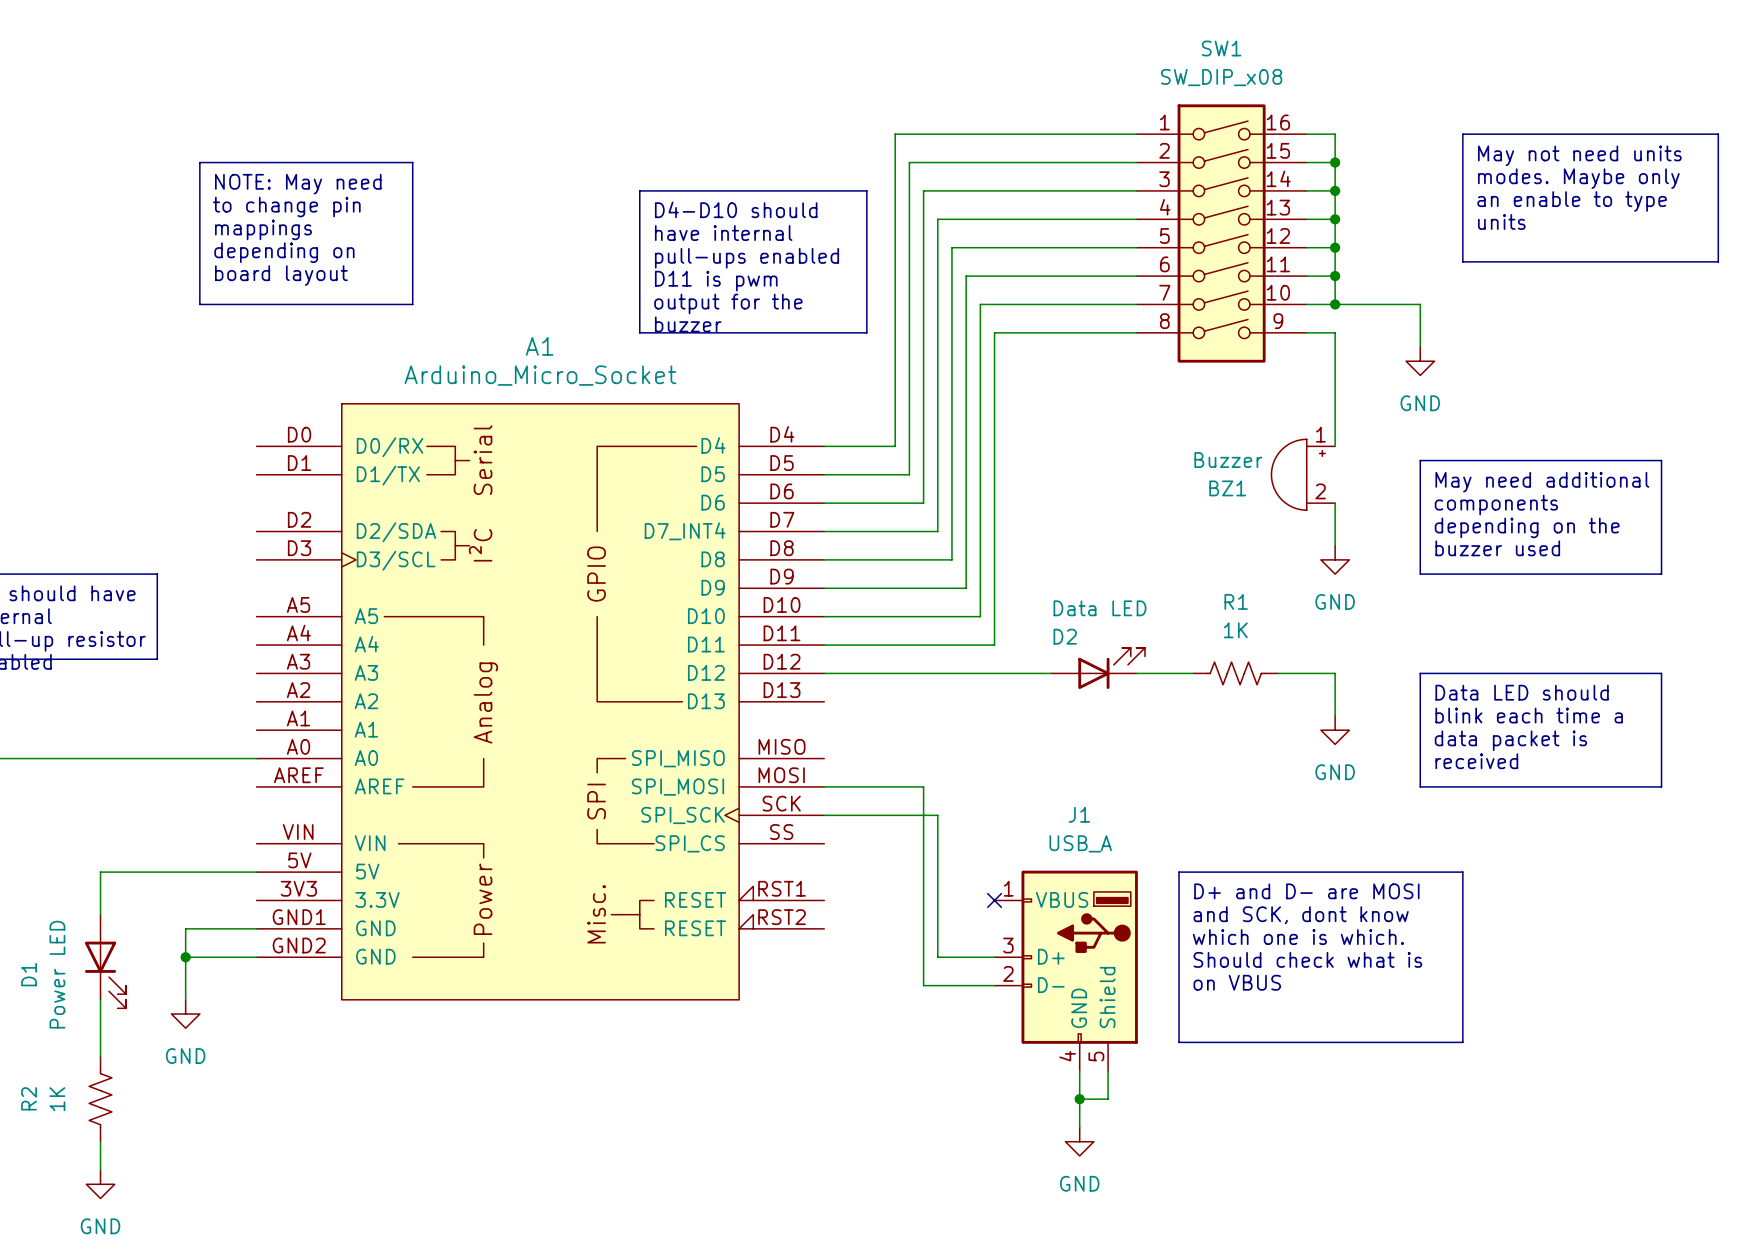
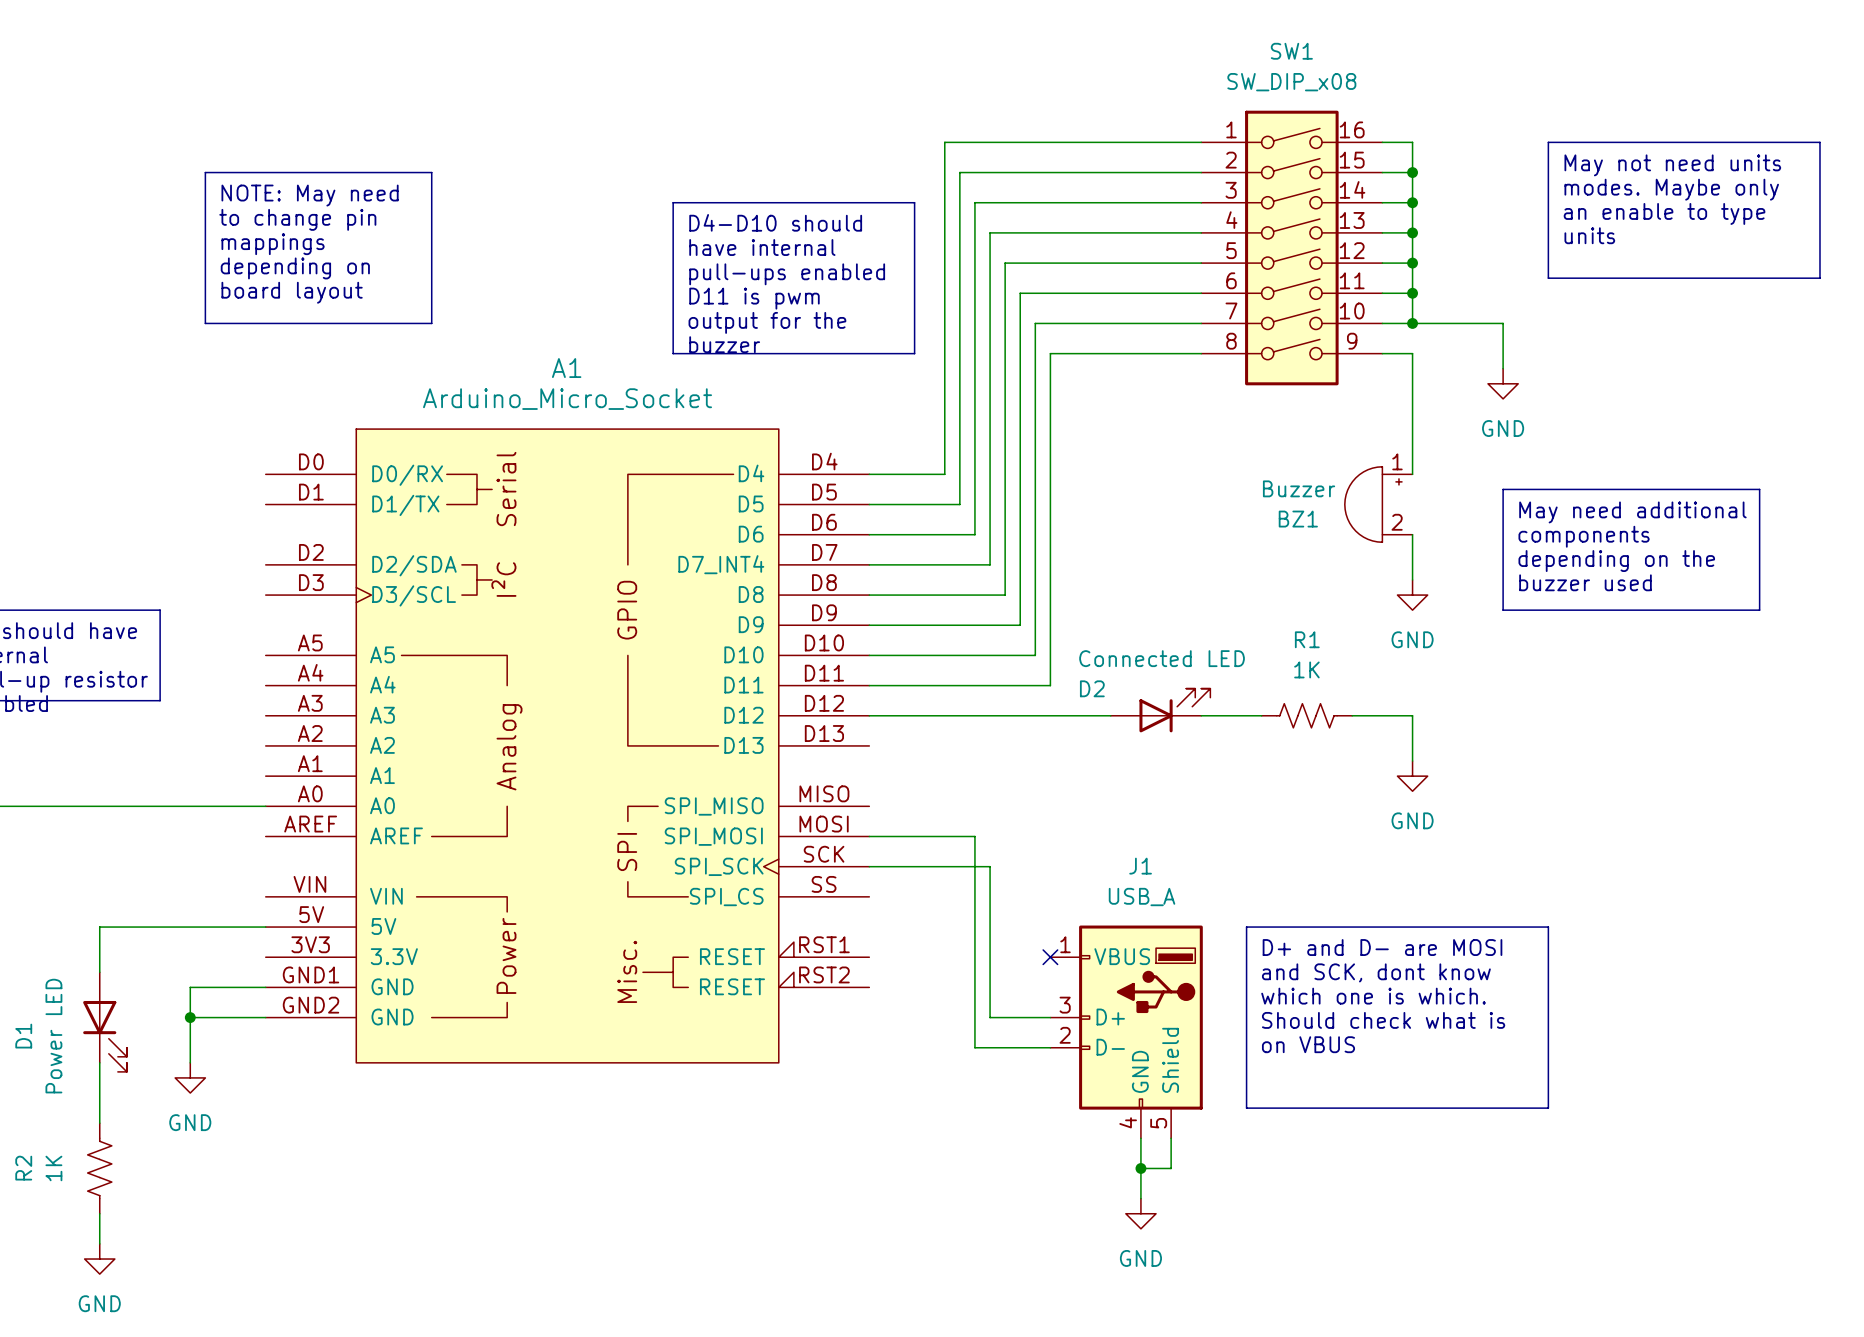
D2 value: Data LED (1100, 608) -> Connected LED (1162, 658)
D2 name position: D2 (1065, 636) -> D2 (1092, 688)
line: (1420, 673) (1661, 673) (1661, 786) (1420, 786) (1420, 673) -> none
text: Data LED should (1522, 692) -> none
text: blink each time a (1529, 715) -> none
text: data packet is (1510, 740) -> none
text: received (1476, 761) -> none

